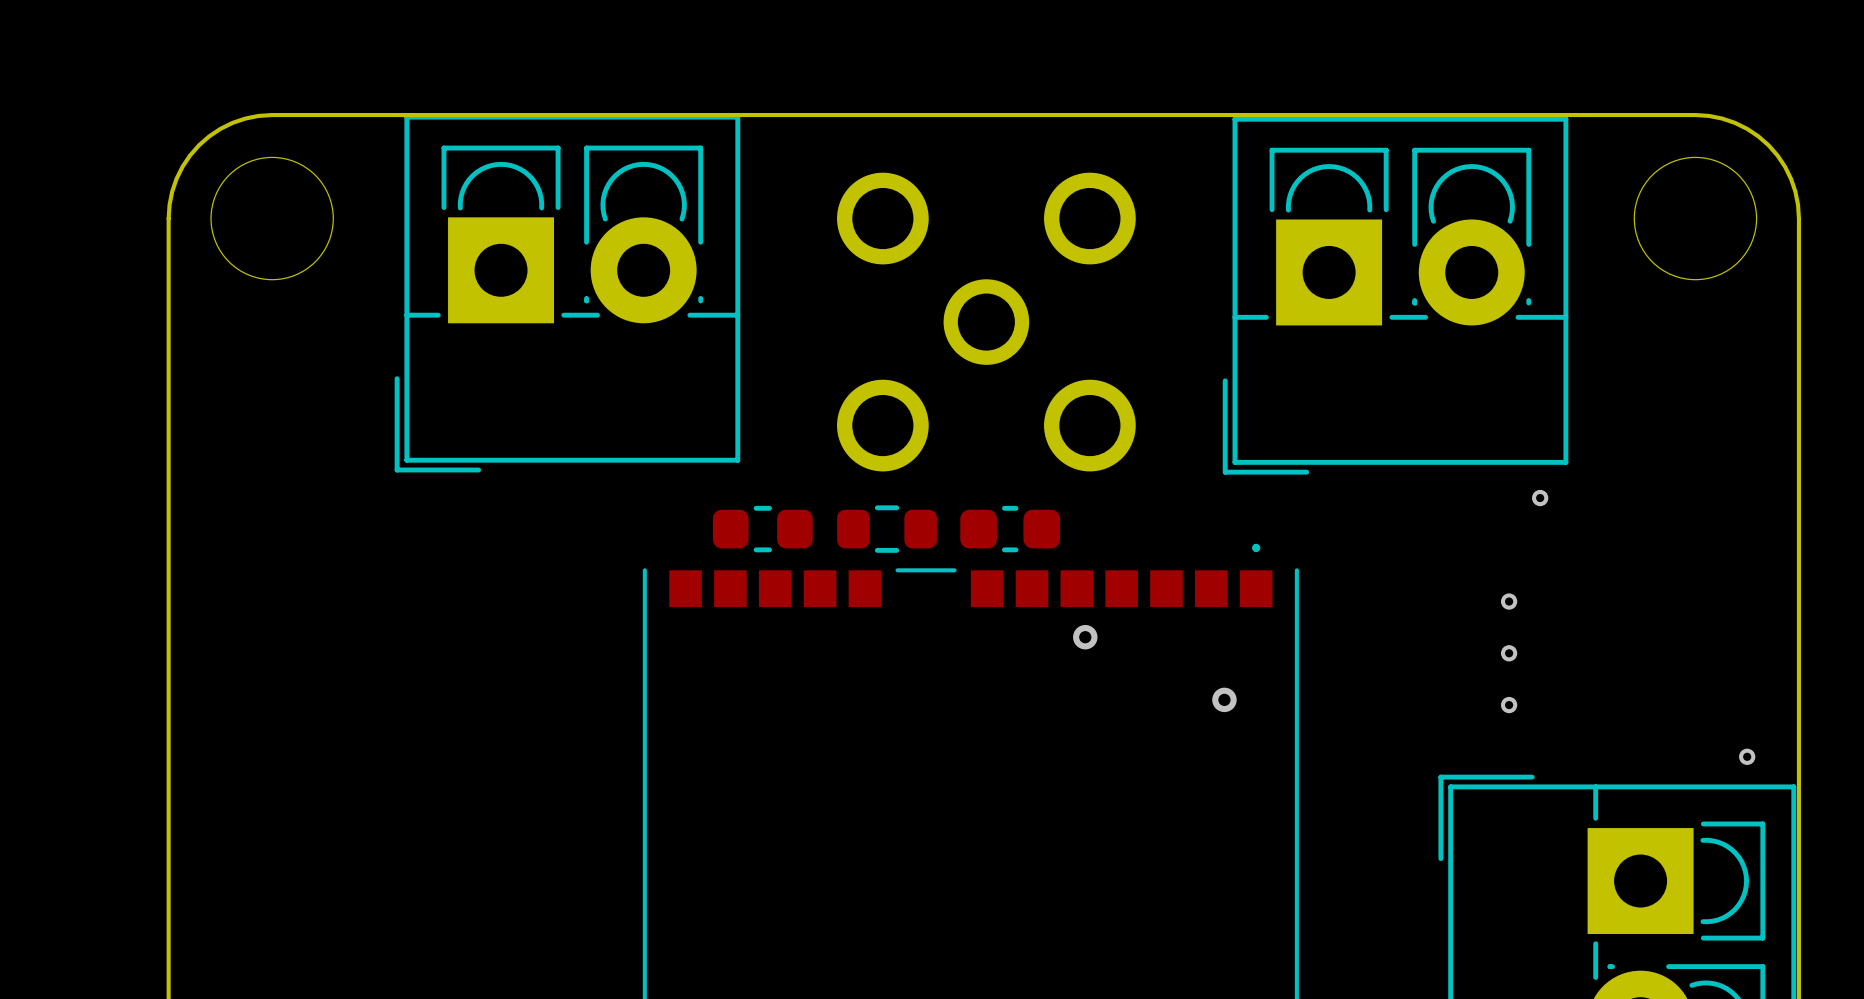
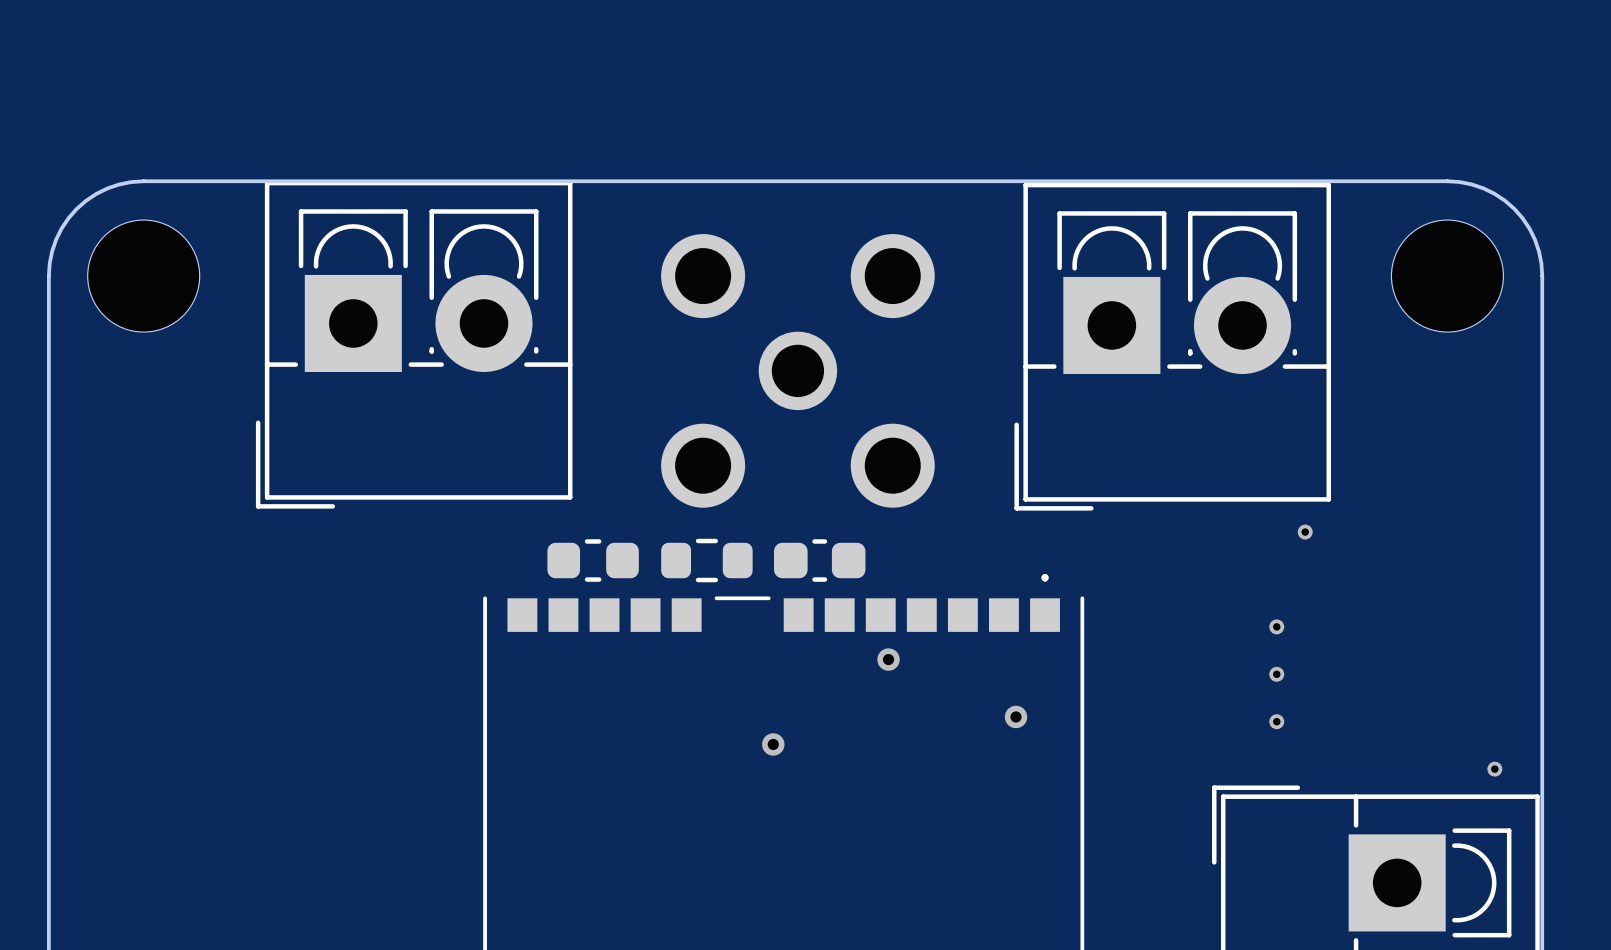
via: none -> (773, 744)

